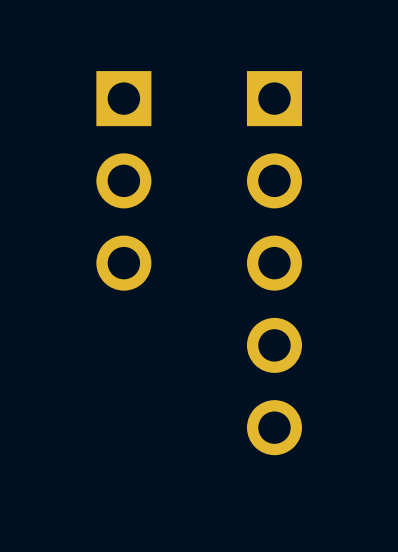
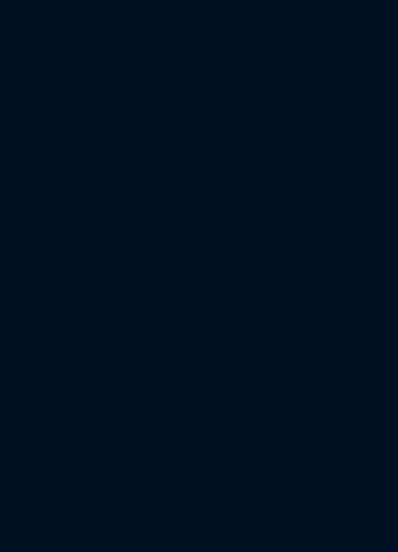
part: (123, 180) -> none
part: (274, 263) -> none

